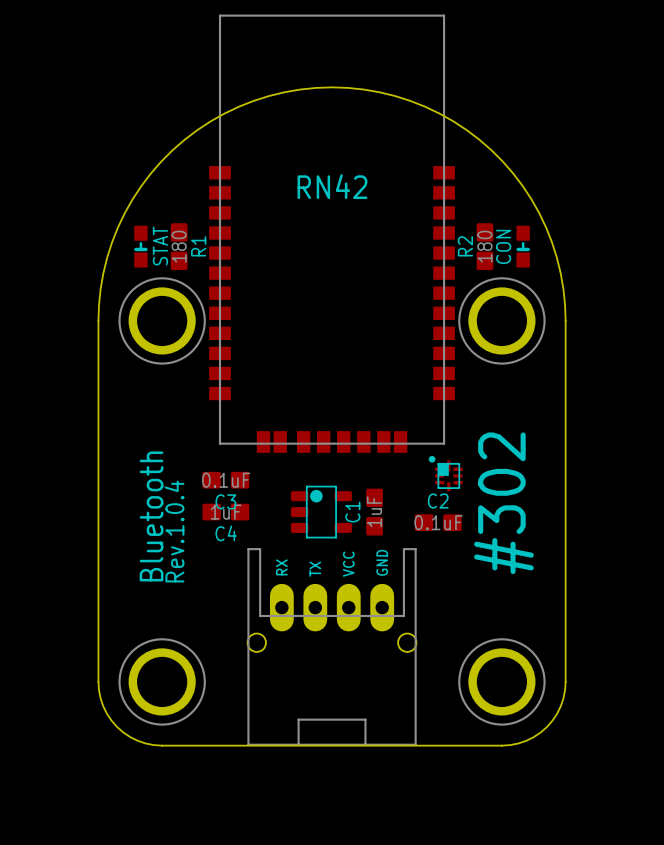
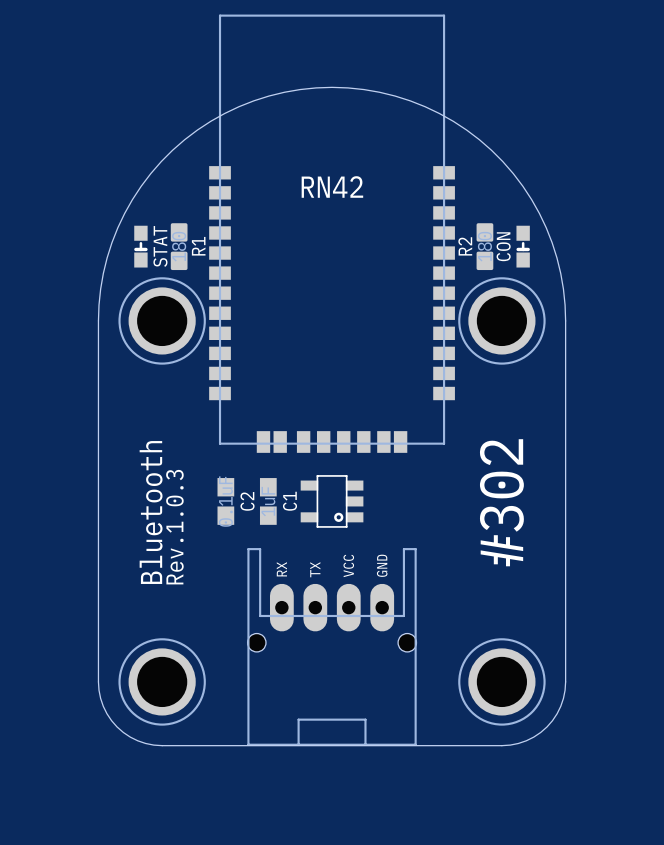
part: (445, 473) -> none
C3: 0.1uF (225, 480) -> none
part footprint: [290, 485, 352, 539] -> [300, 475, 364, 528]
C1 footprint: [366, 488, 383, 536] -> [259, 478, 277, 525]
C4: 1uF (225, 512) -> none
C1 name position: C1 (352, 512) -> C1 (289, 501)
C2 footprint: [414, 514, 462, 532] -> [217, 478, 235, 525]
text: Rev.1.0.4 (174, 531) -> Rev.1.0.3 (174, 527)

